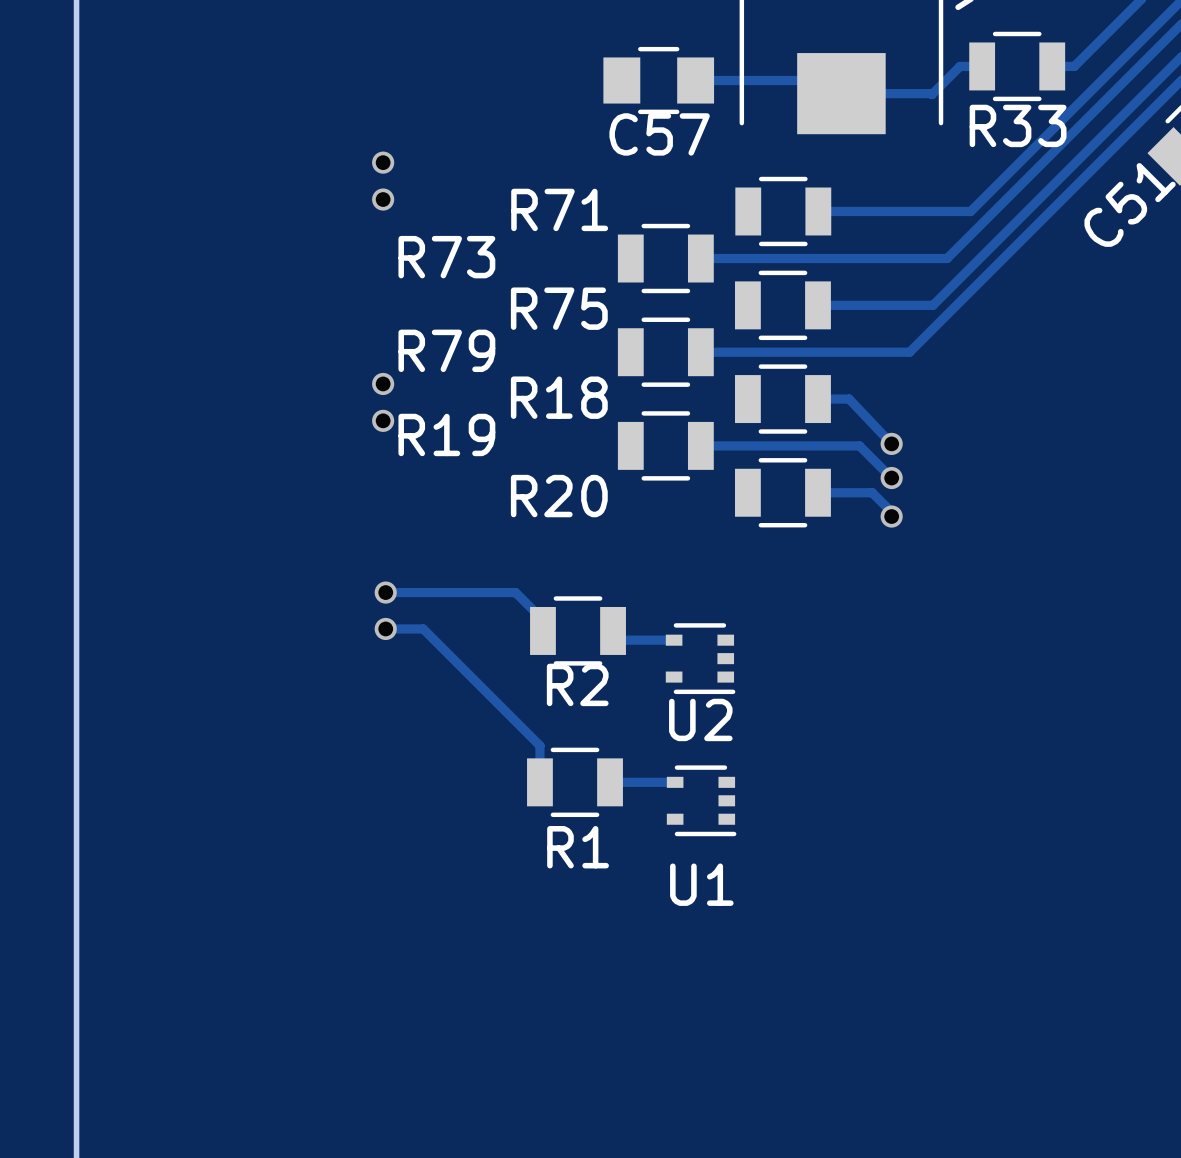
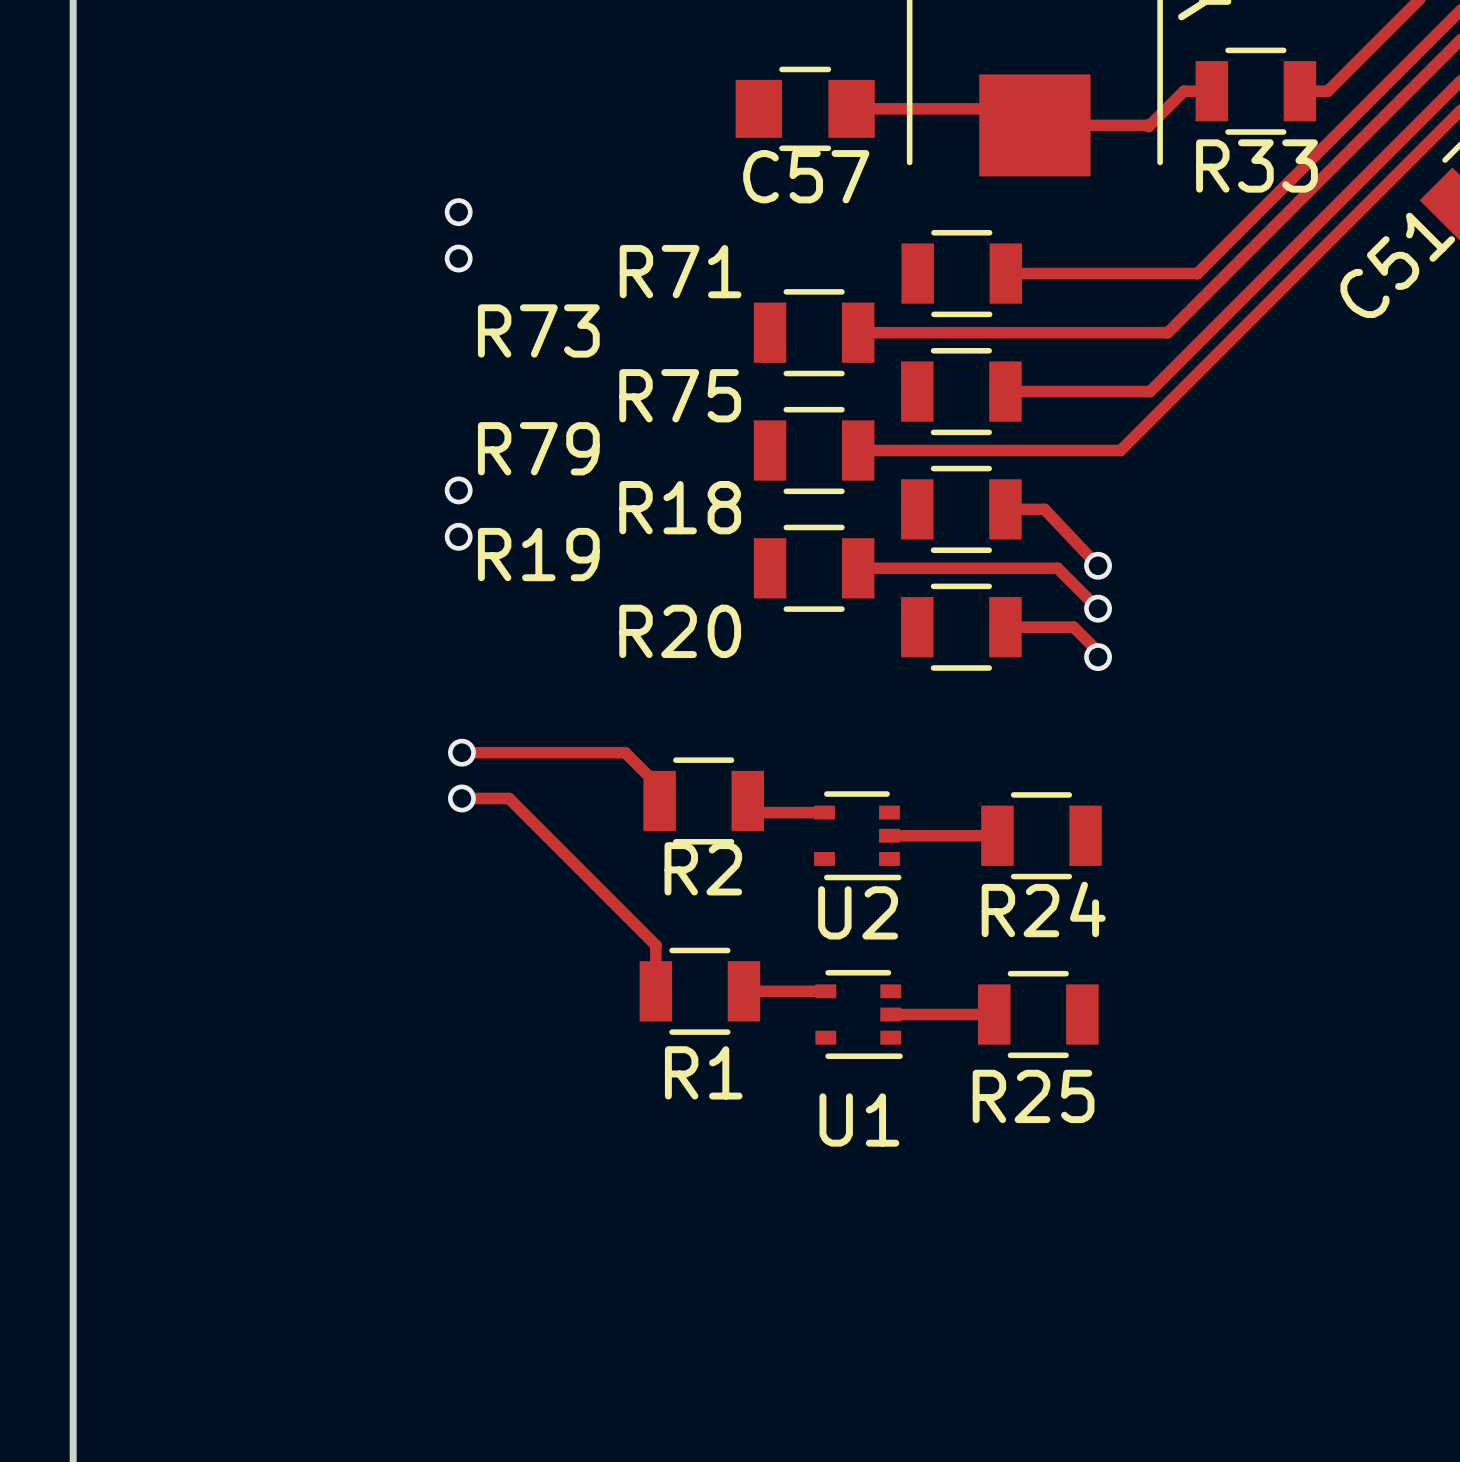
track: none -> (889, 835) (997, 835)
R24: none -> (1041, 835)
track: none -> (890, 1014) (994, 1014)
R25: none -> (1038, 1014)

